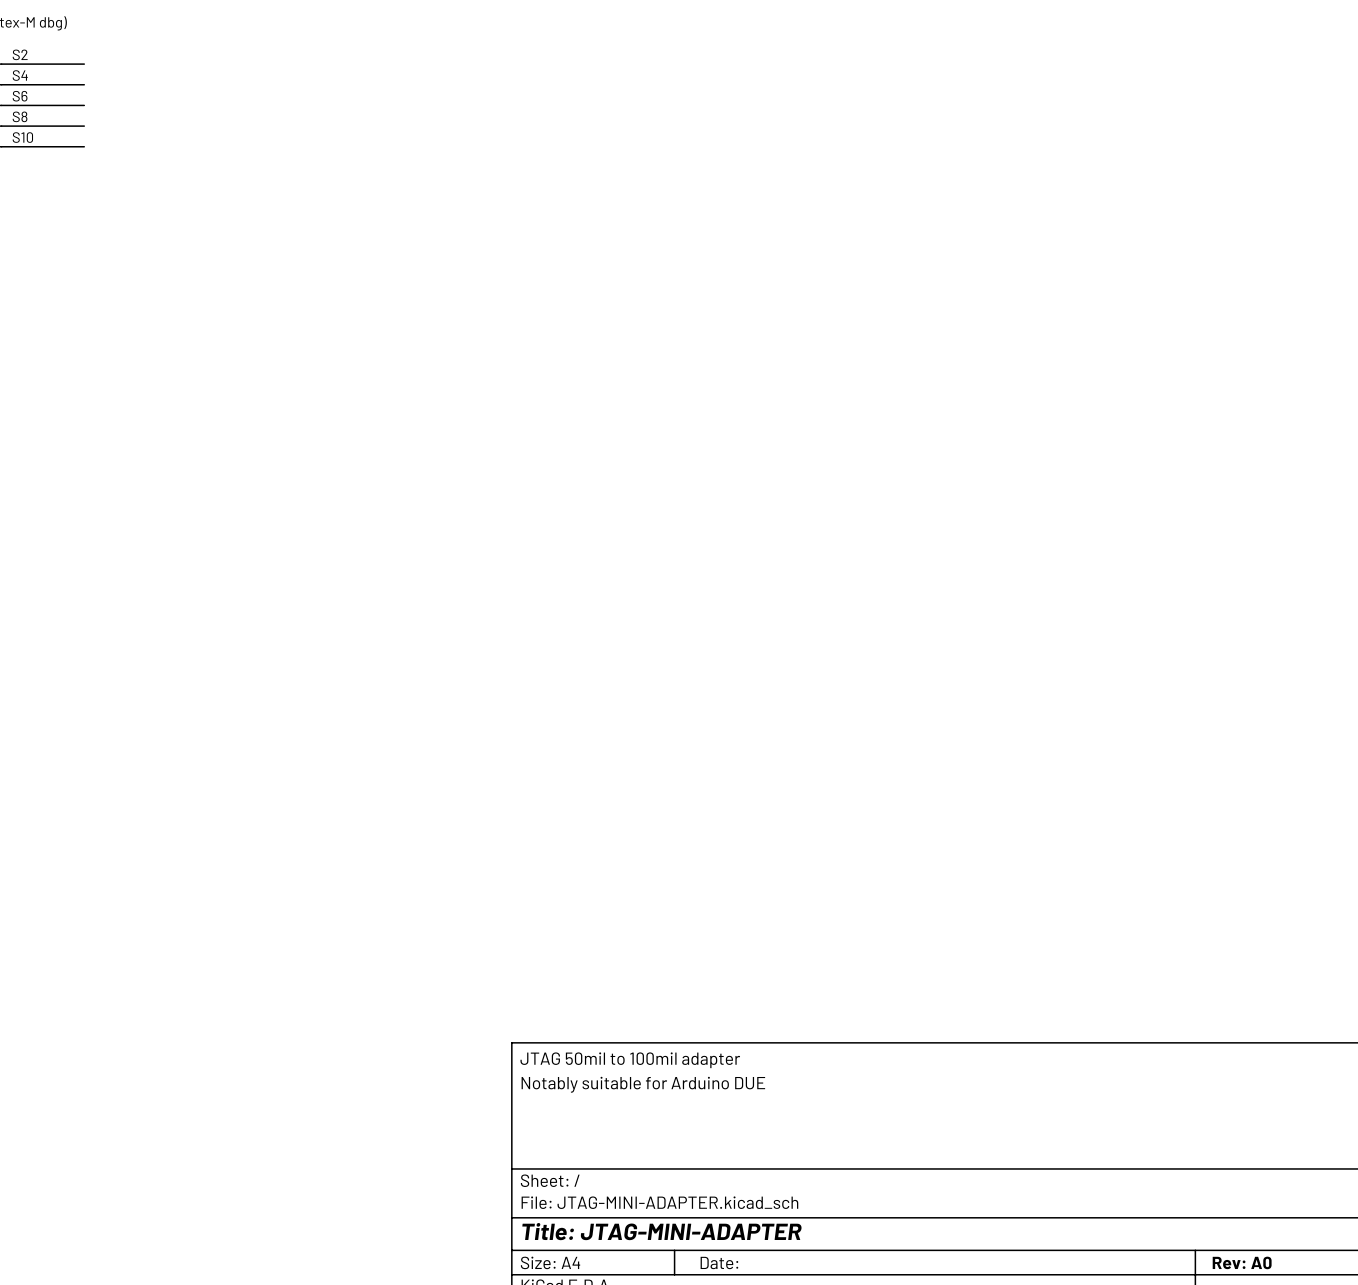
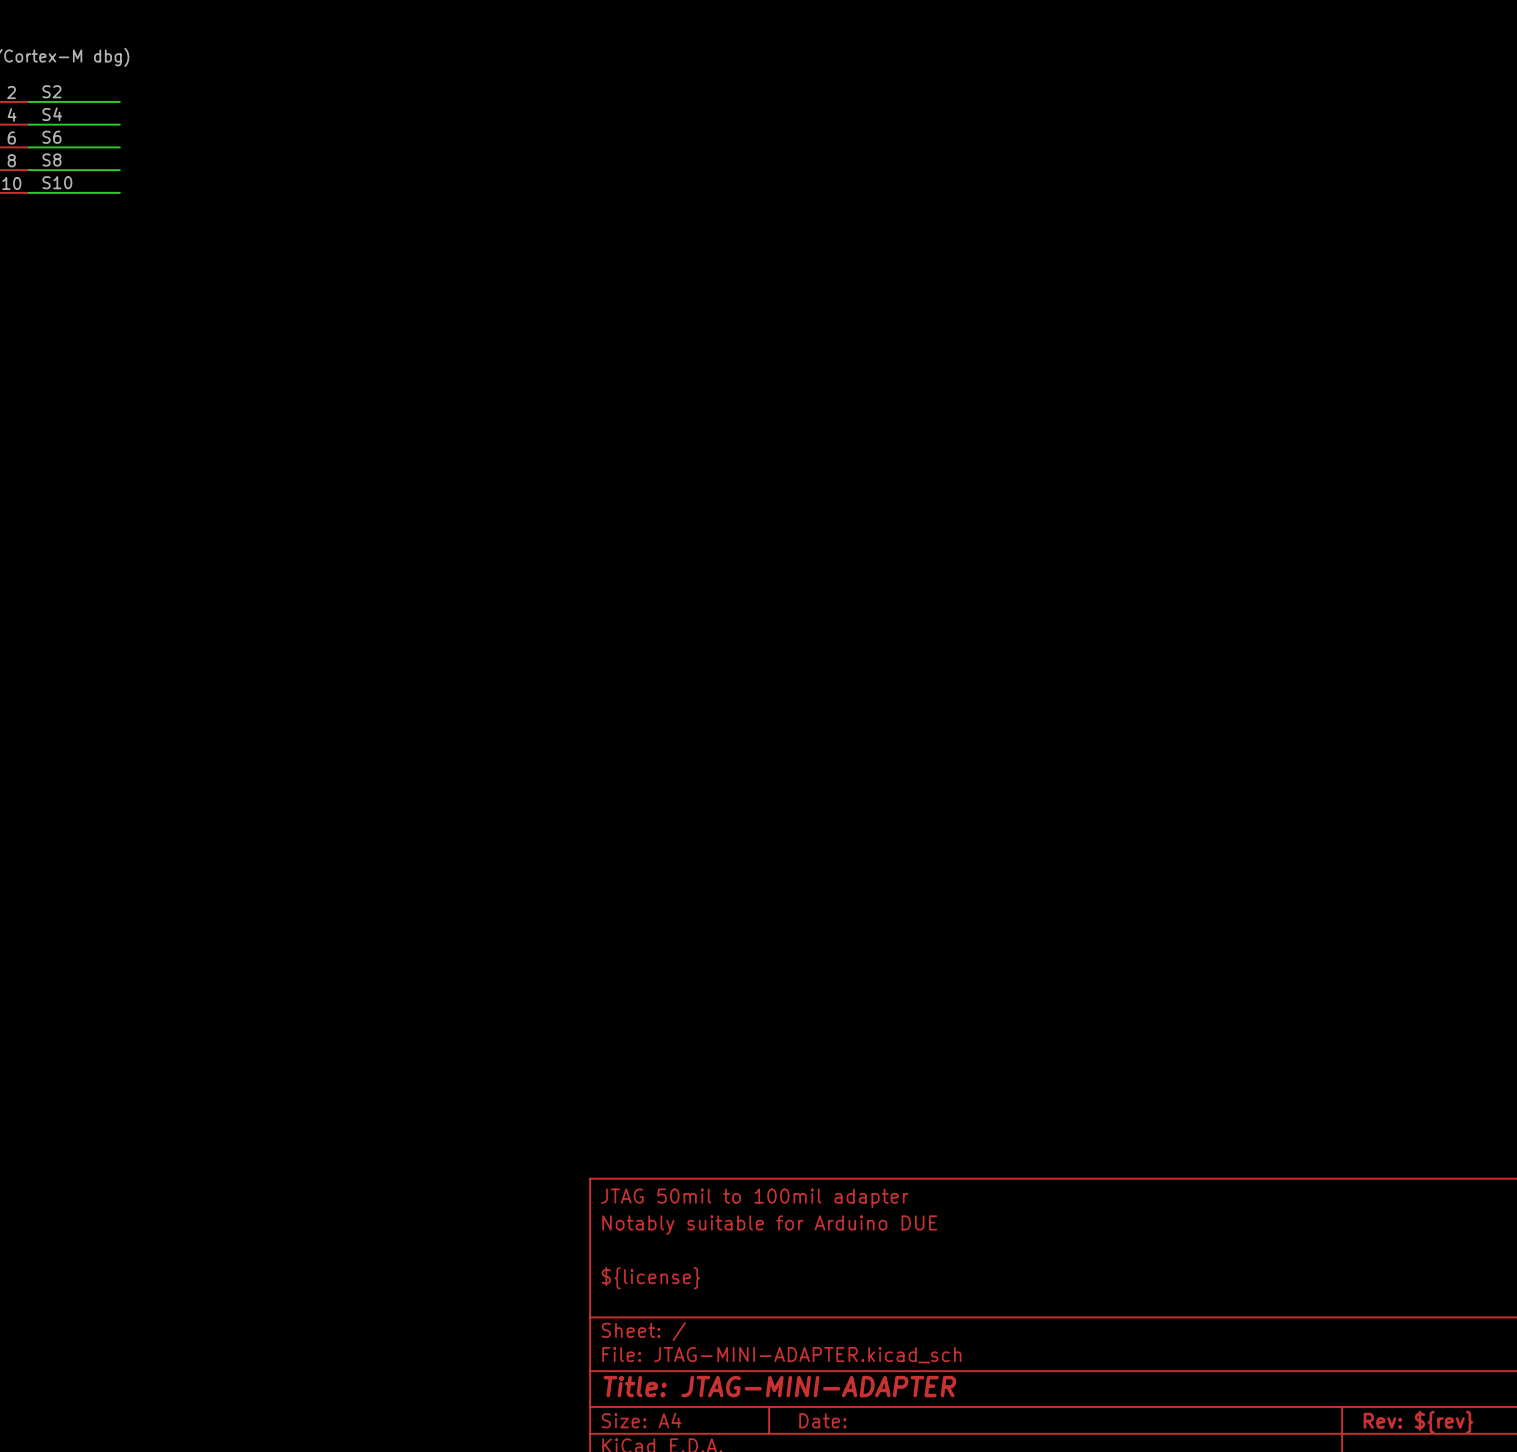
title block: none -> ${license} (650, 1278)
title block: Rev: A0 (1242, 1262) -> Rev: ${rev} (1418, 1422)

